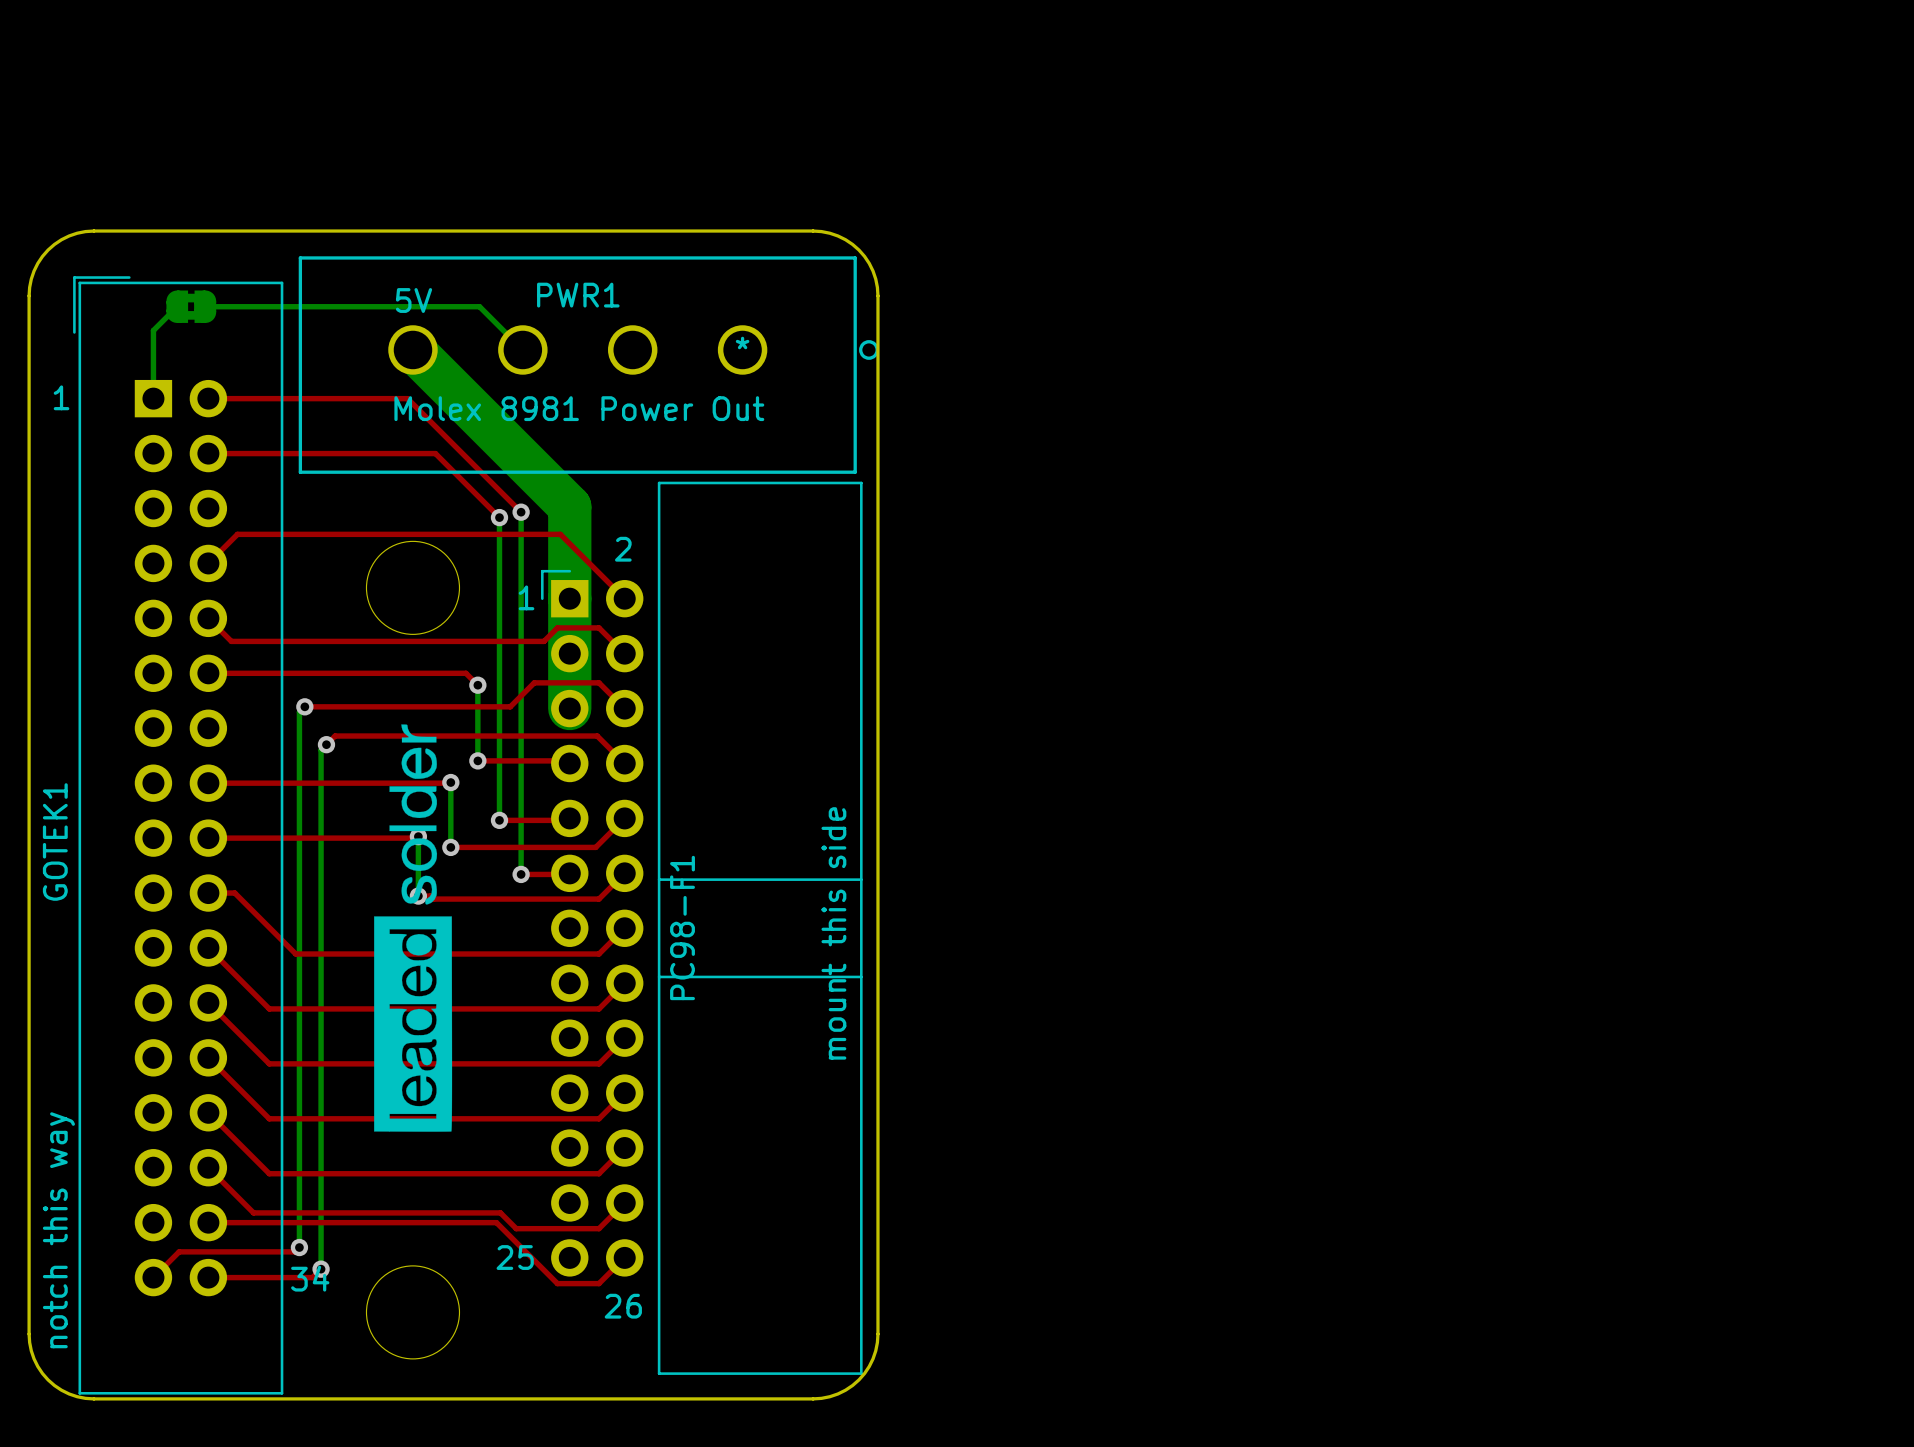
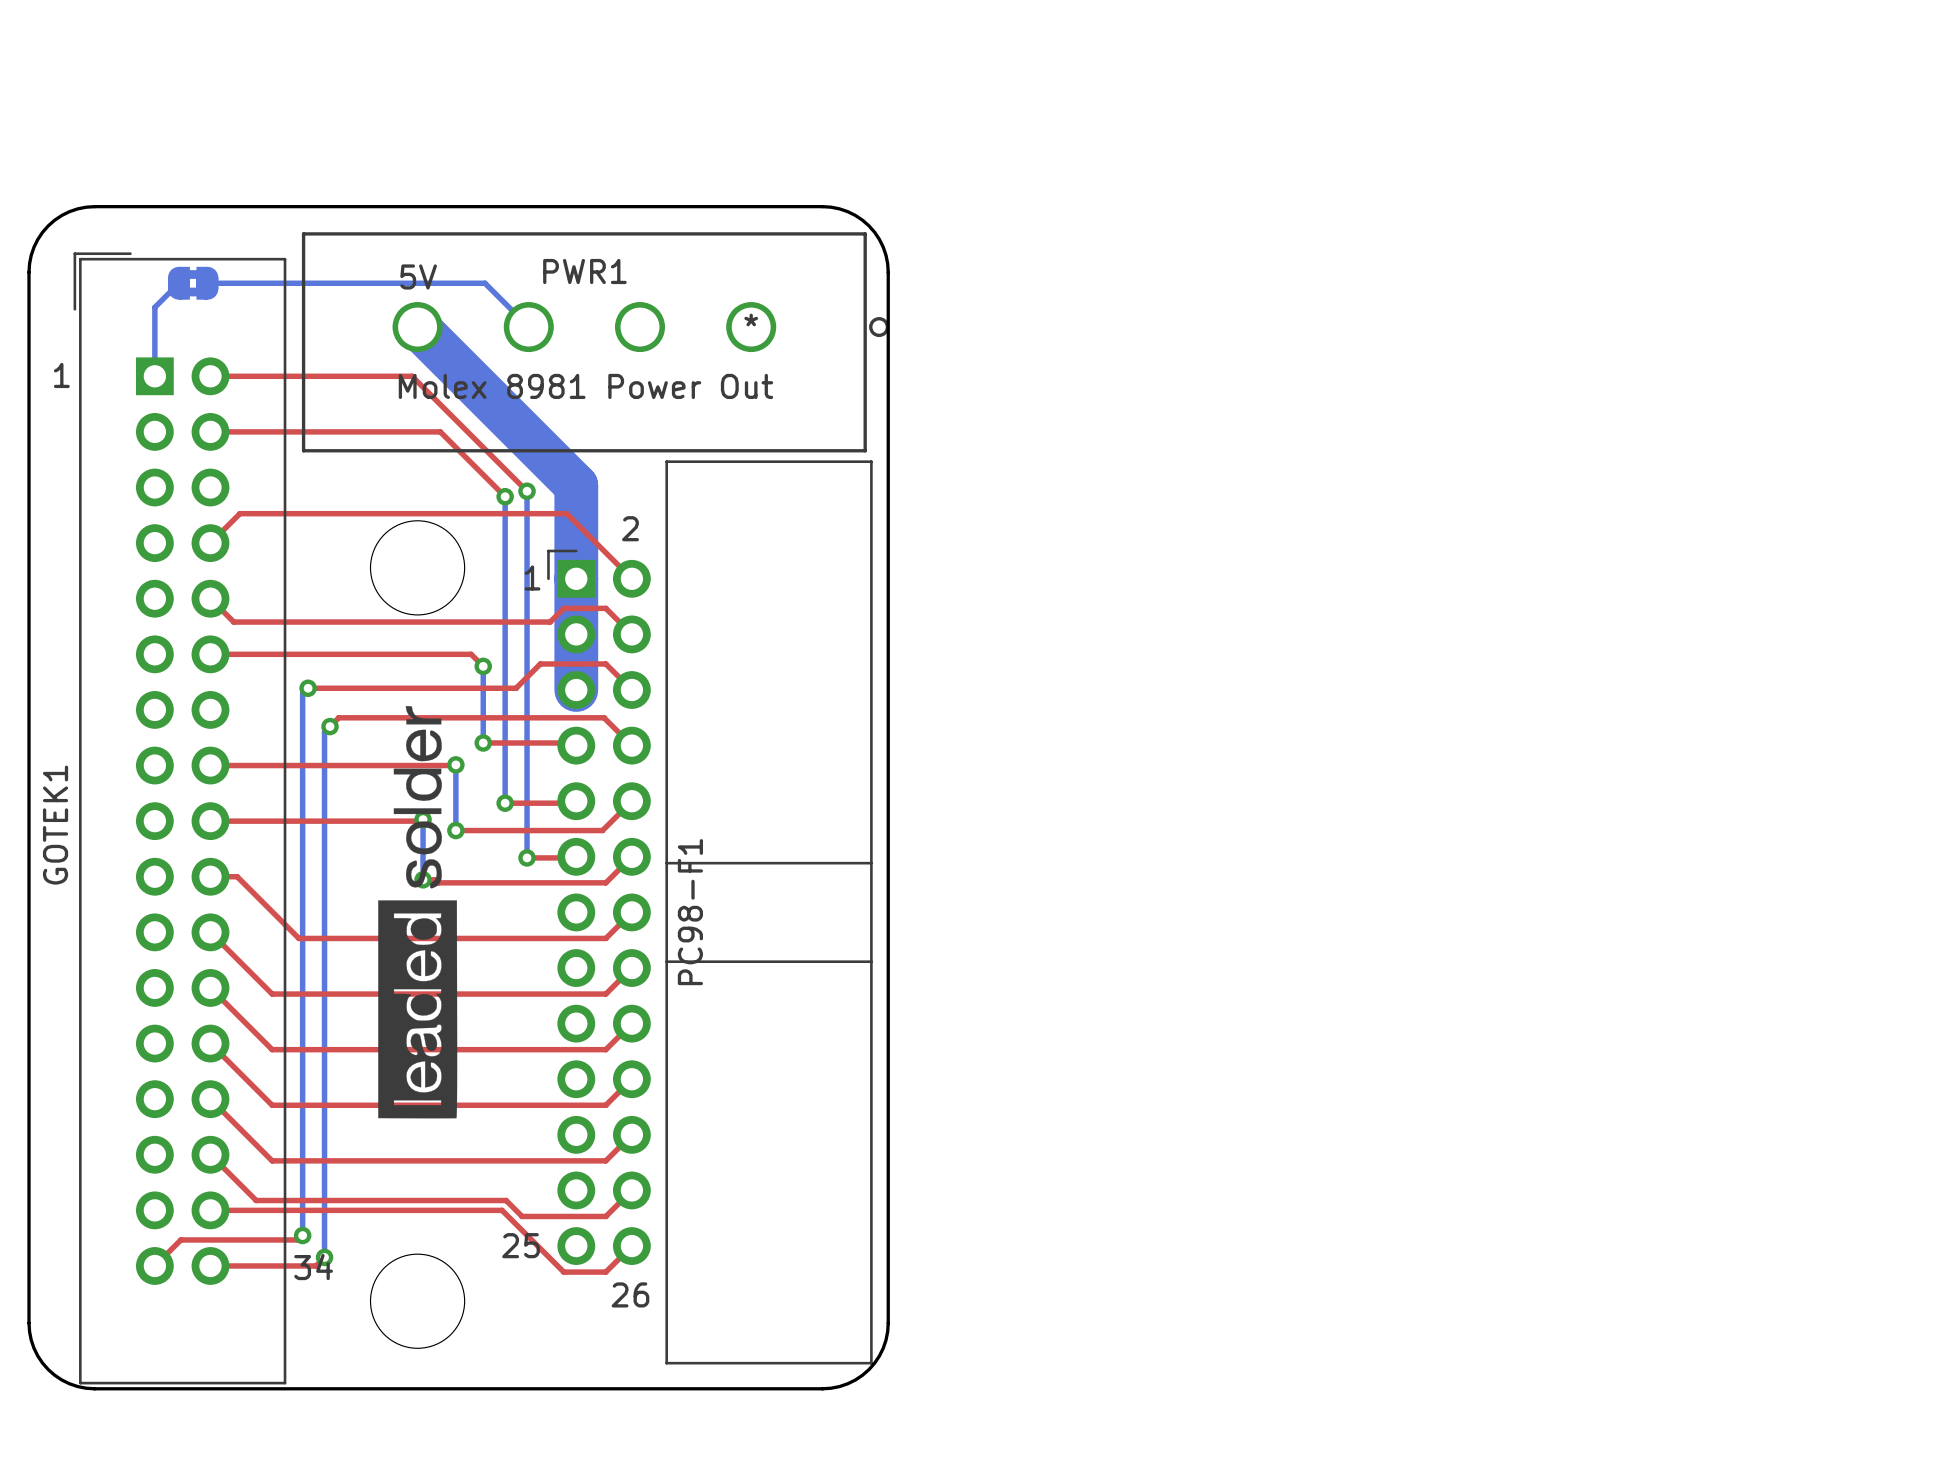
text: mount this side (833, 933) -> none
text: notch this way (58, 1230) -> none

